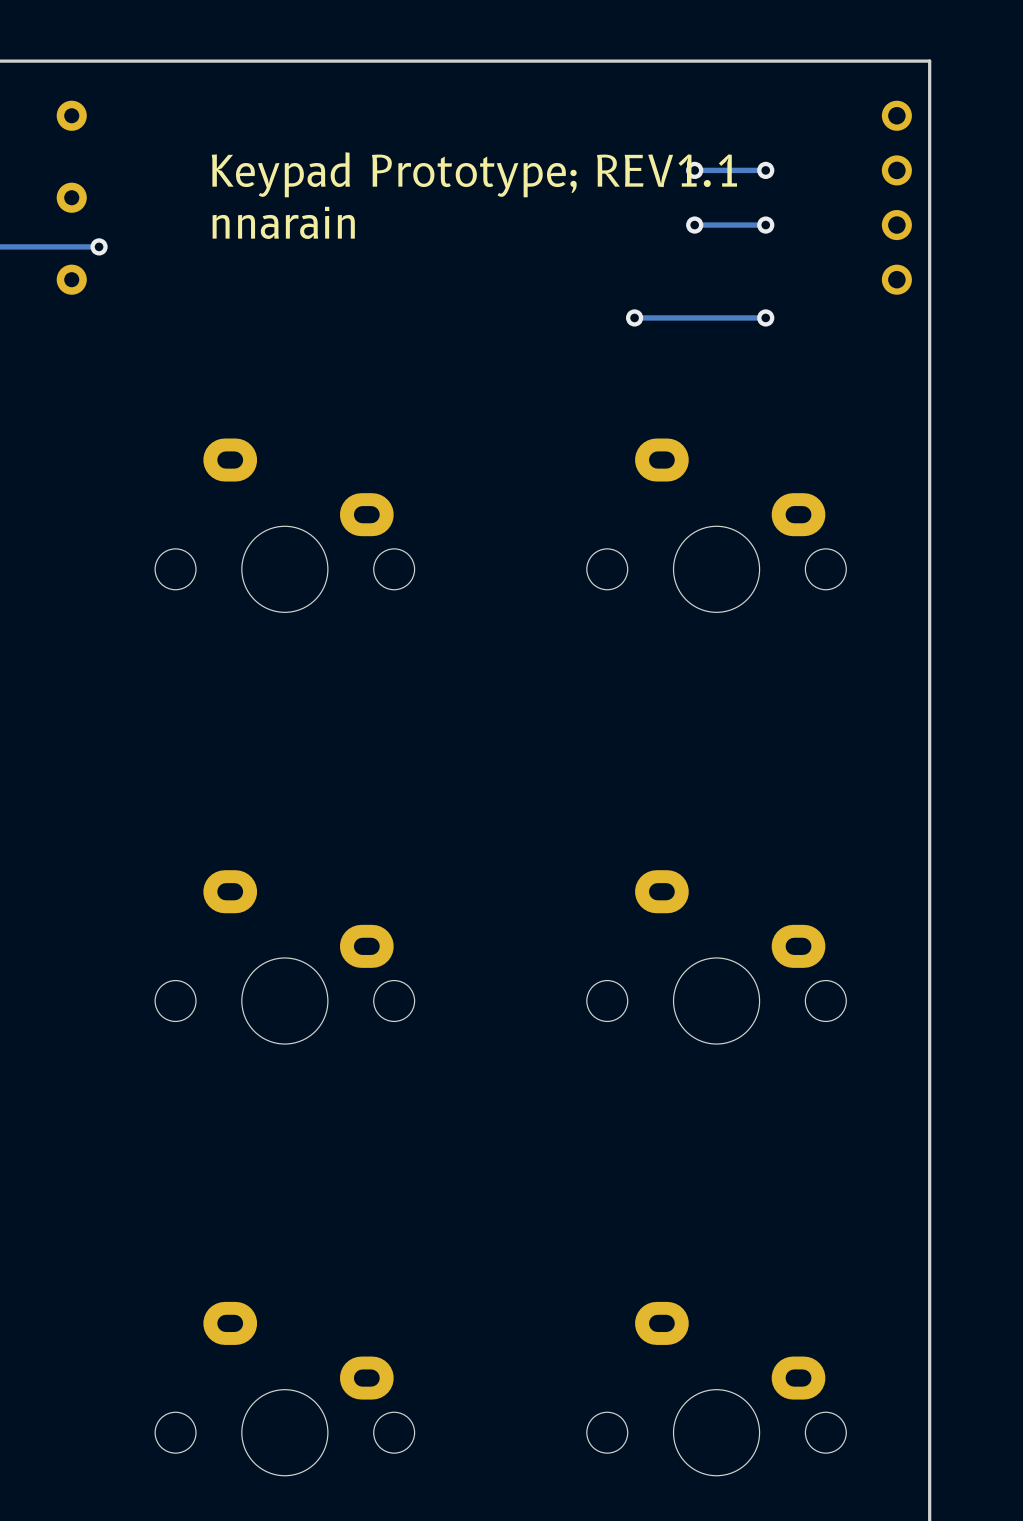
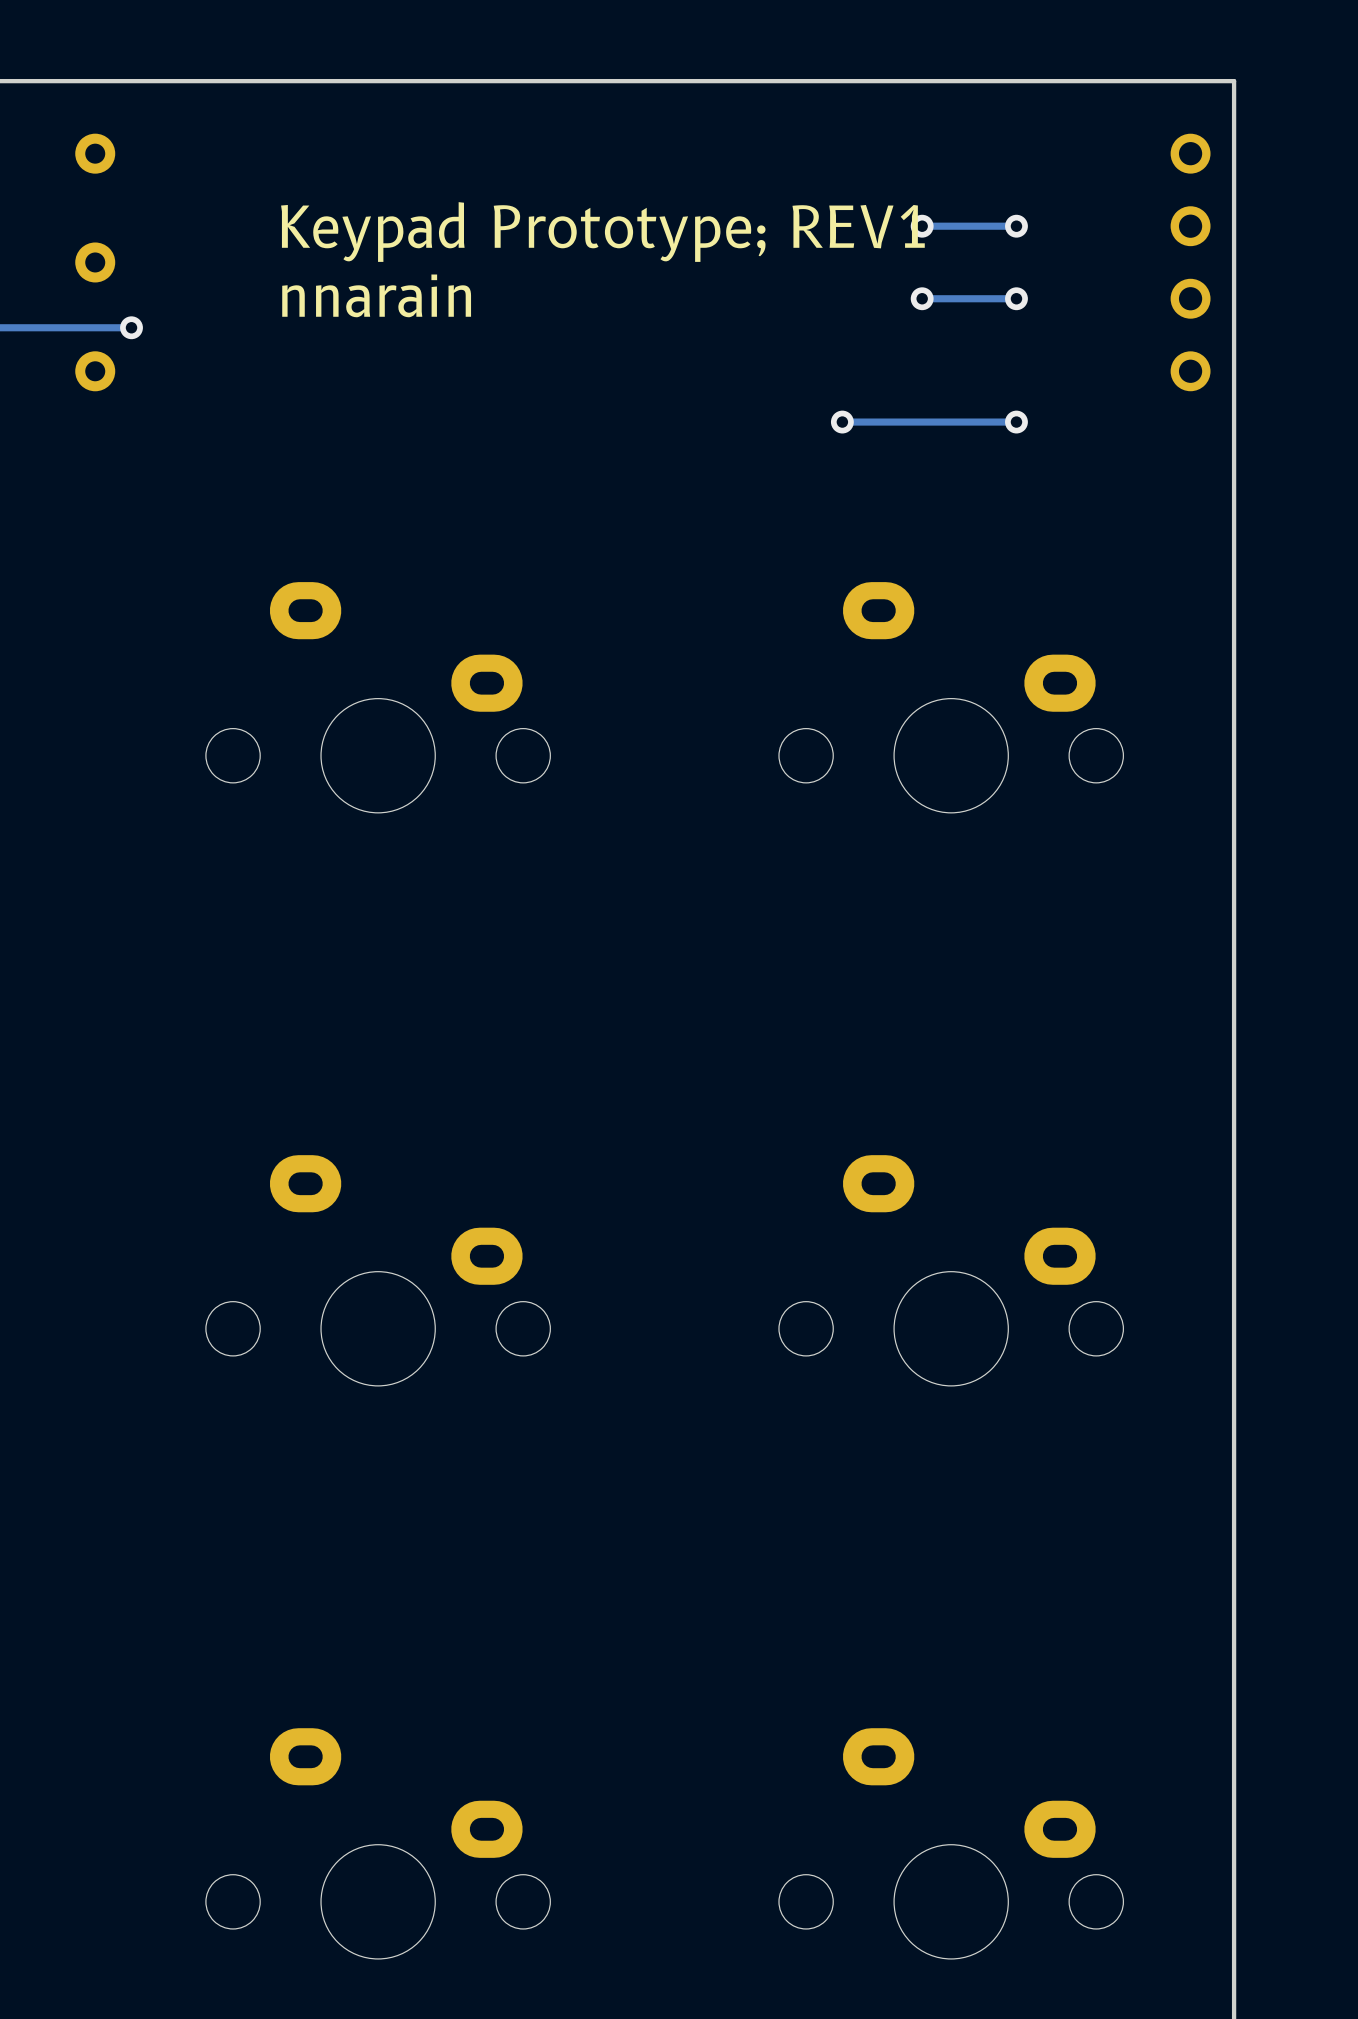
text: Keypad Prototype; REV1.1 (474, 174) -> Keypad Prototype; REV1 (602, 232)

